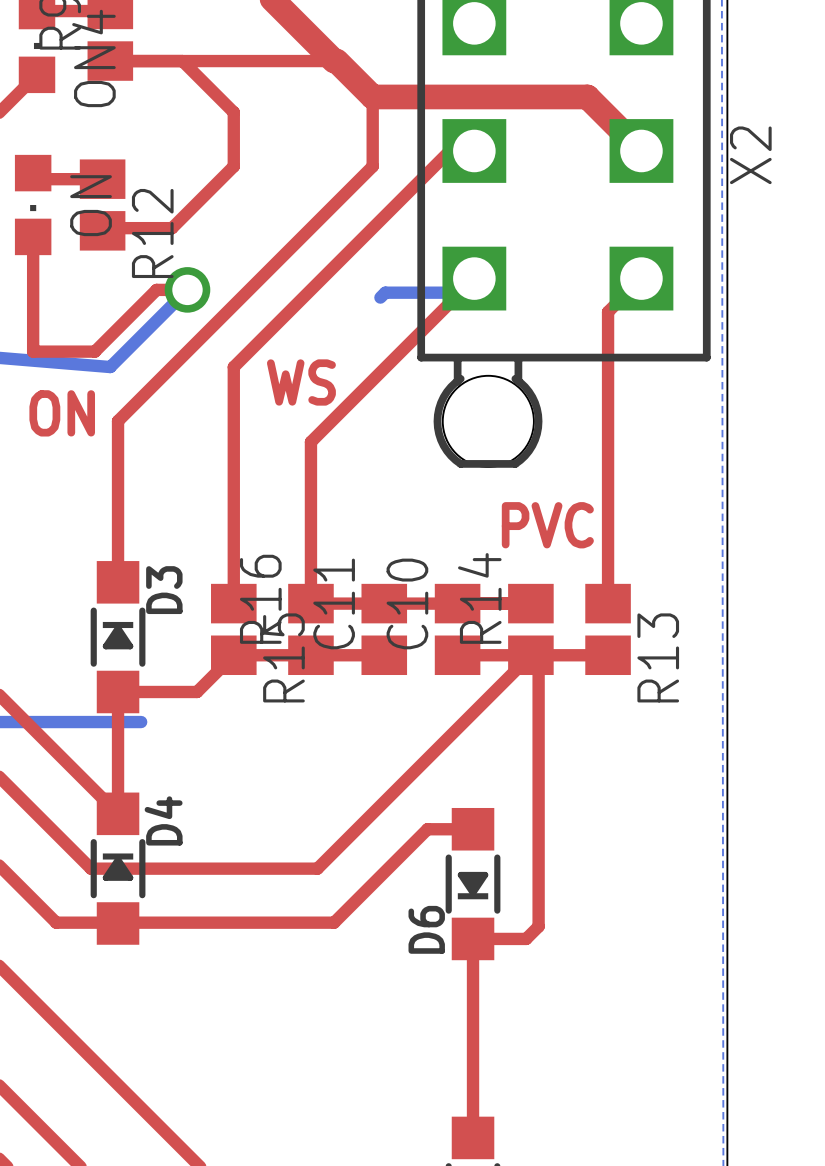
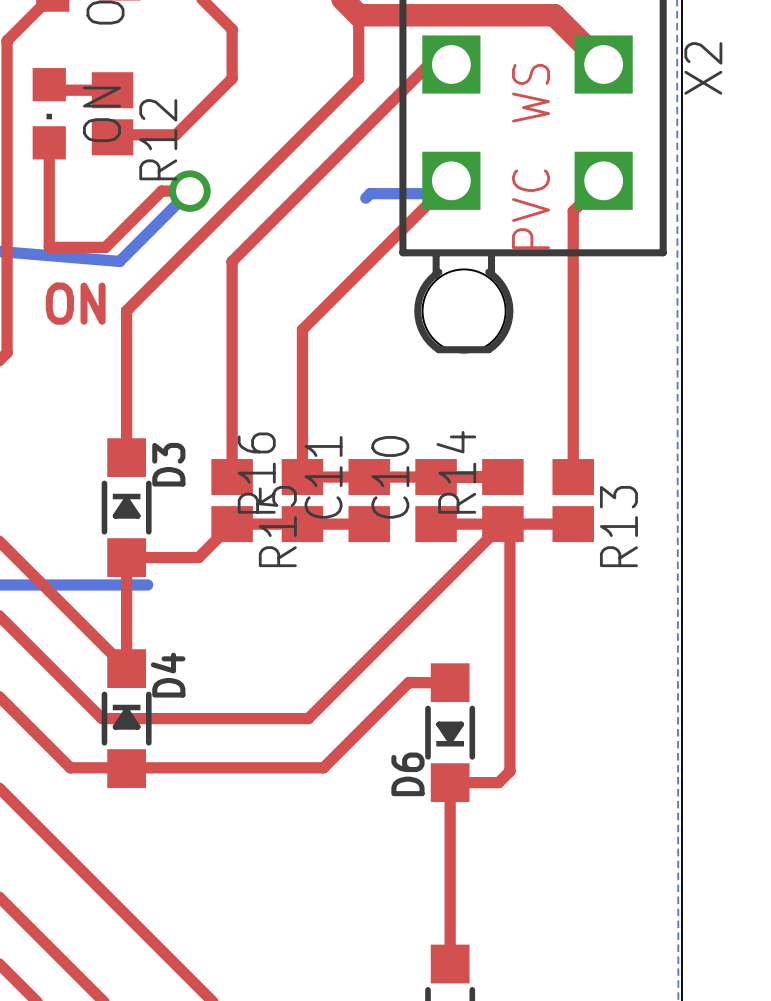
text rotation: 0° (301, 382) -> 90° counterclockwise (531, 93)
text position: WS (301, 382) -> WS (531, 93)
text rotation: 0° (547, 525) -> 90° counterclockwise (531, 209)
text position: PVC (547, 525) -> PVC (531, 209)

